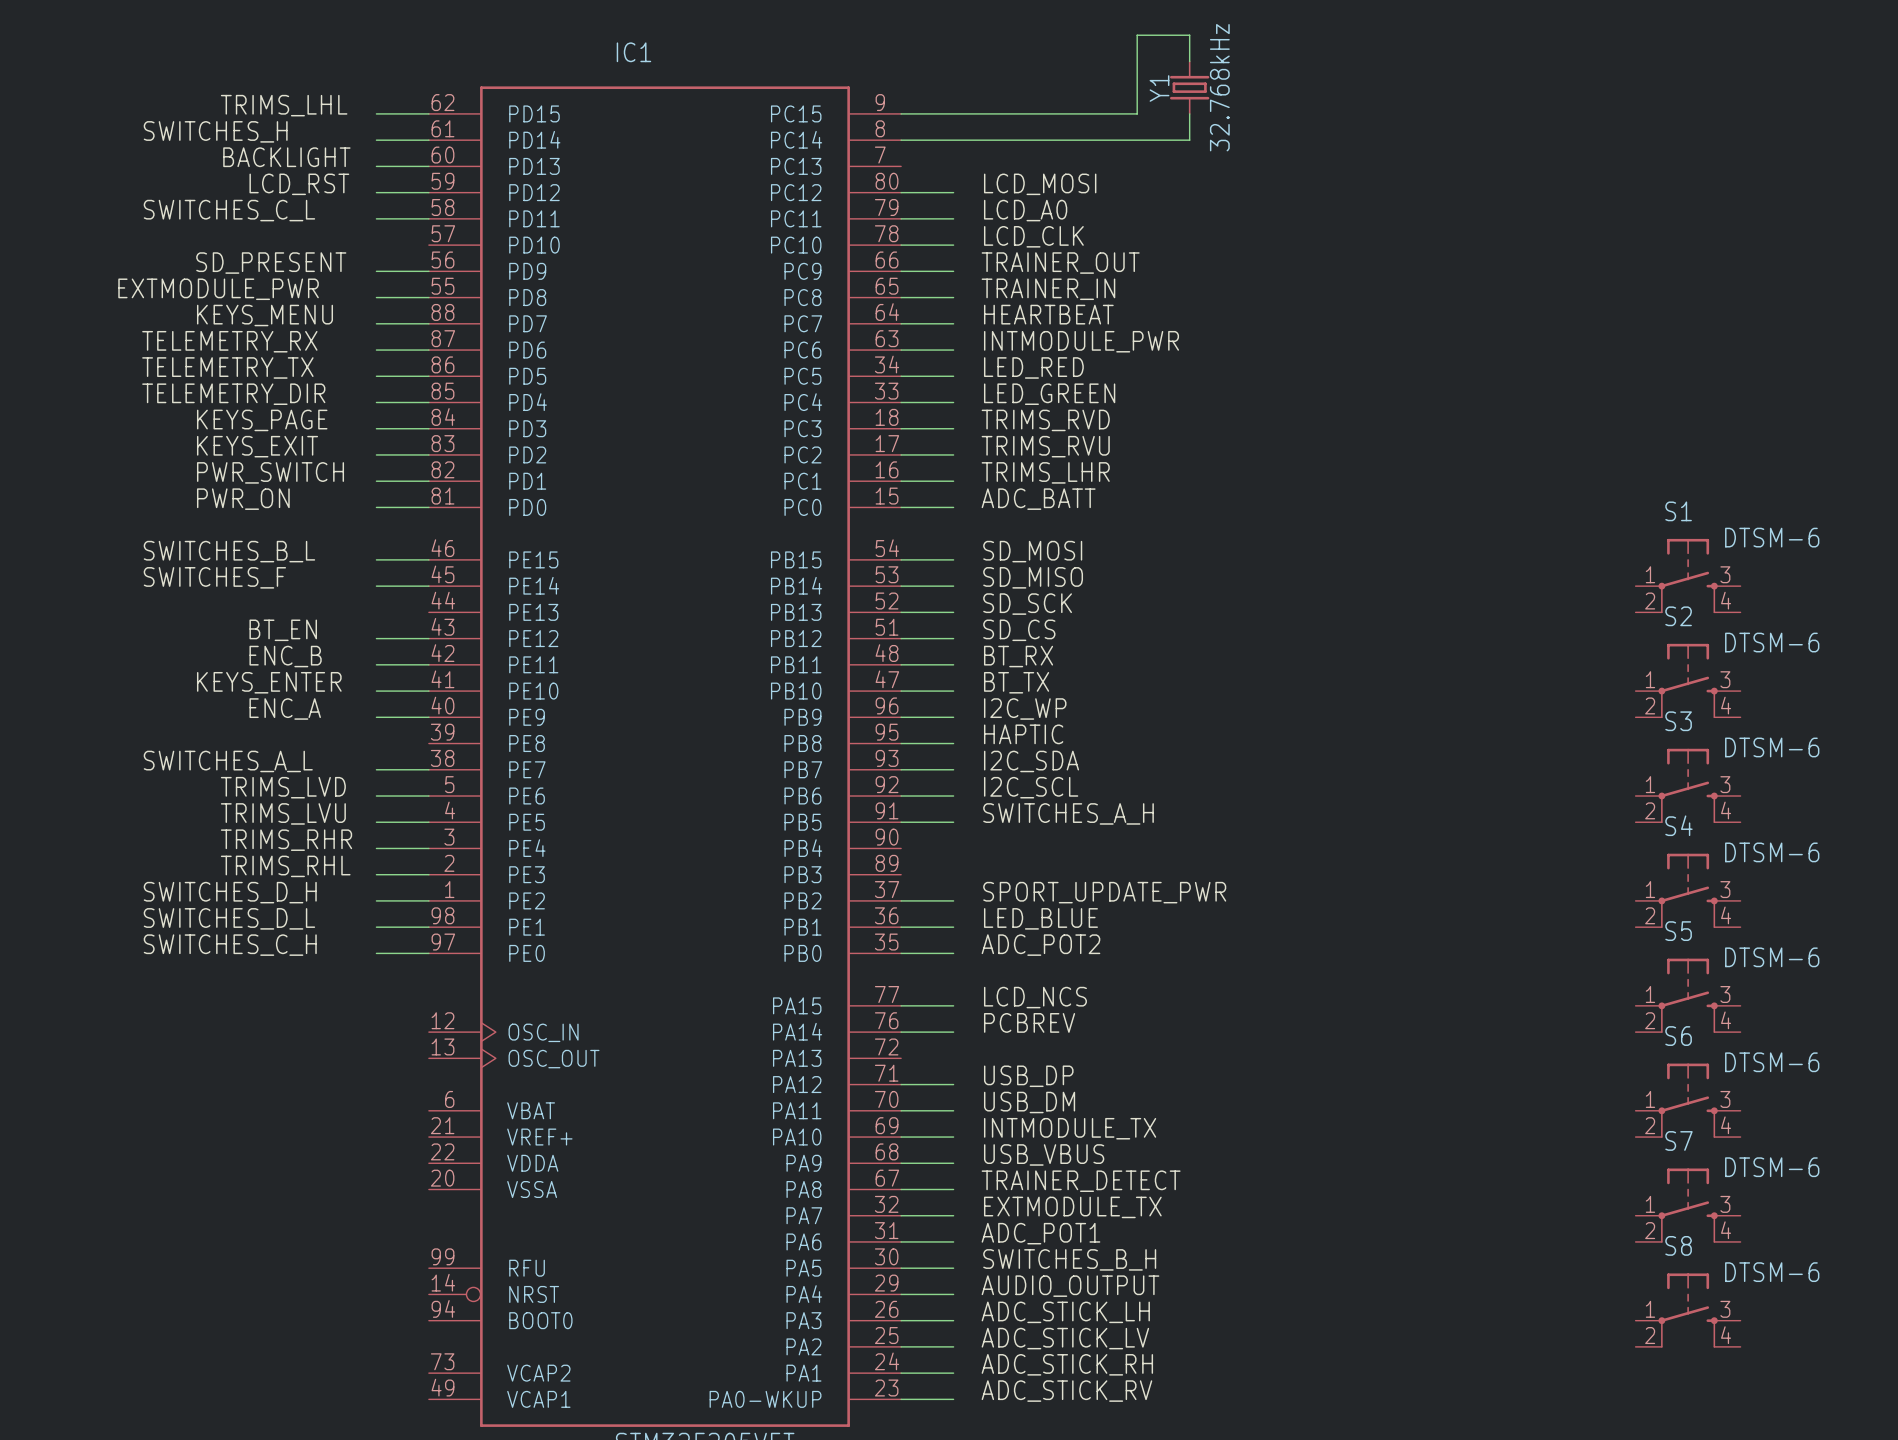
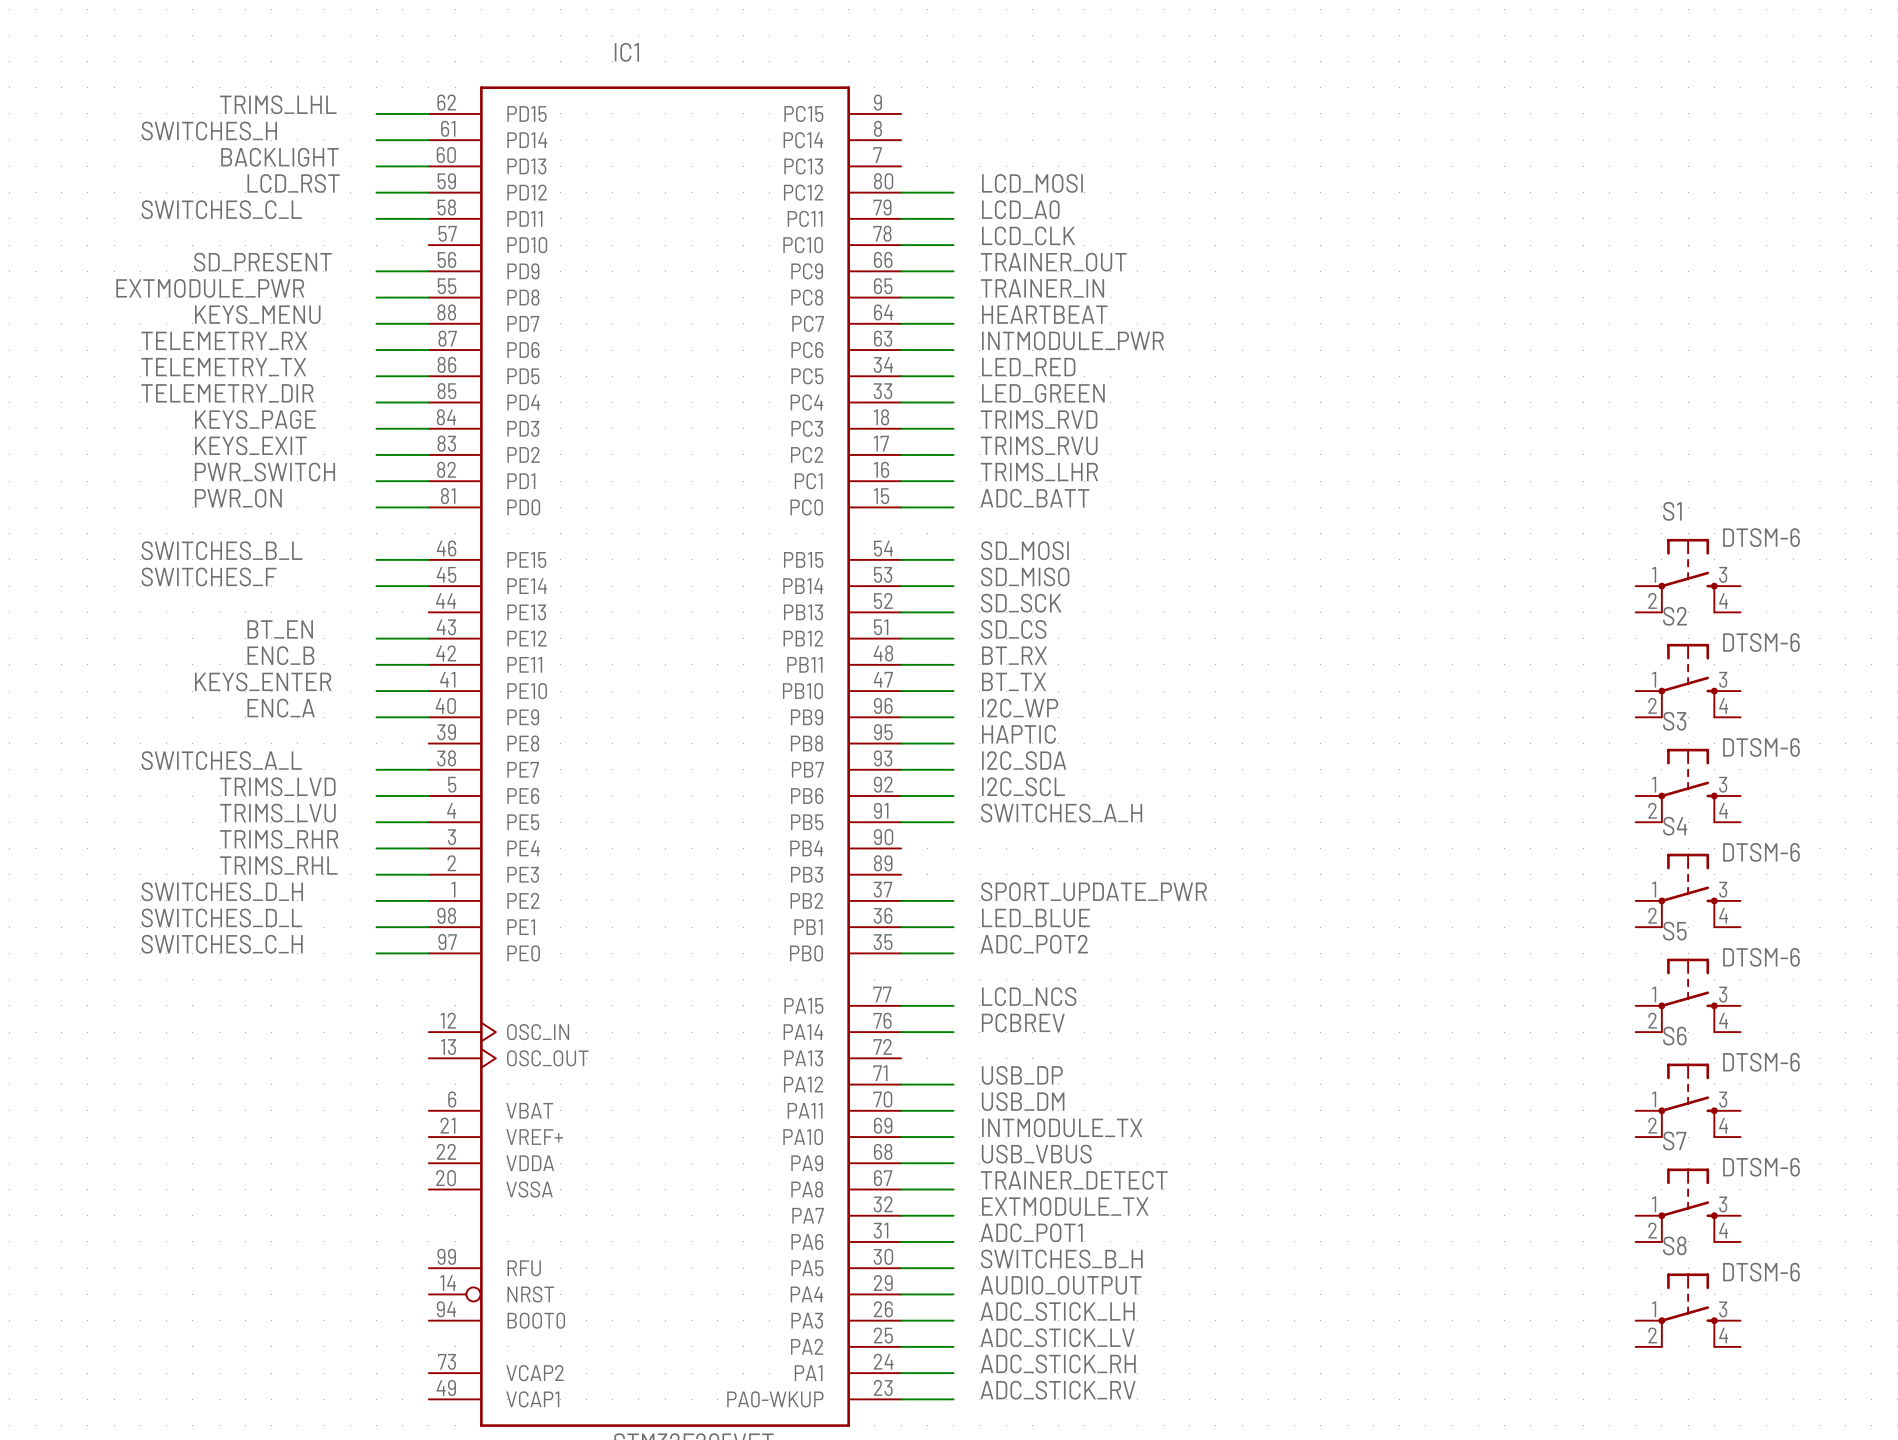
wire: (1189, 61) (1189, 35) (1137, 35) (1137, 113) (901, 113) -> none
Y1: 32.768kHz (1189, 87) -> none
wire: (1189, 113) (1189, 140) (901, 140) -> none

